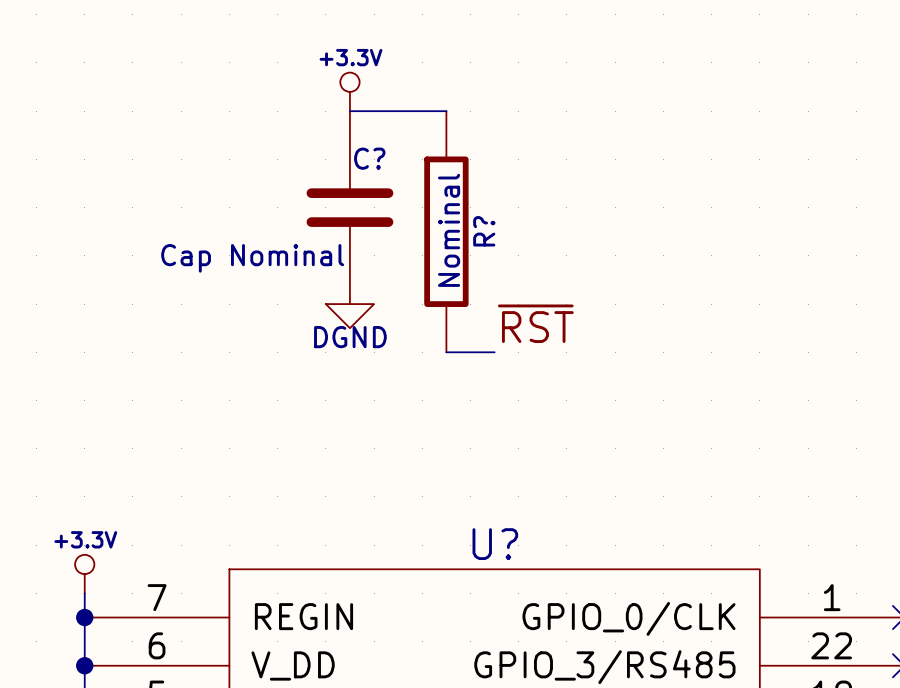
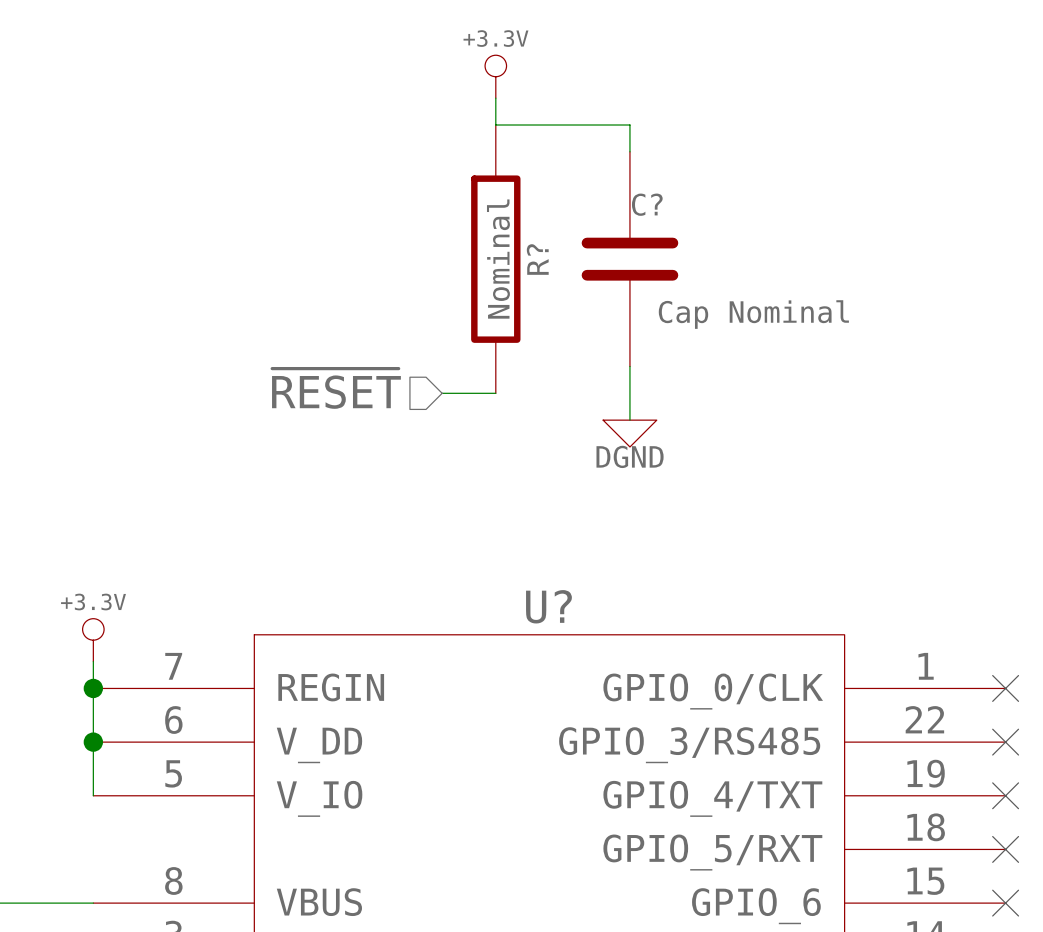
wire: none -> (495, 98) (495, 125) (629, 125) (629, 151)
power symbol position: +3.3V (349, 91) -> +3.3V (495, 76)
wire: (349, 111) (446, 111) -> none
C? position: (349, 207) -> (629, 259)
C? value position: Cap Nominal (252, 258) -> Cap Nominal (753, 314)
power symbol position: DGND (349, 316) -> DGND (629, 433)
label: ~{RST} (535, 323) -> none
wire: none -> (629, 366) (629, 420)
hierarchical label: none -> ~{RESET} (336, 388)
wire: (446, 352) (494, 352) -> (495, 393) (442, 393)

